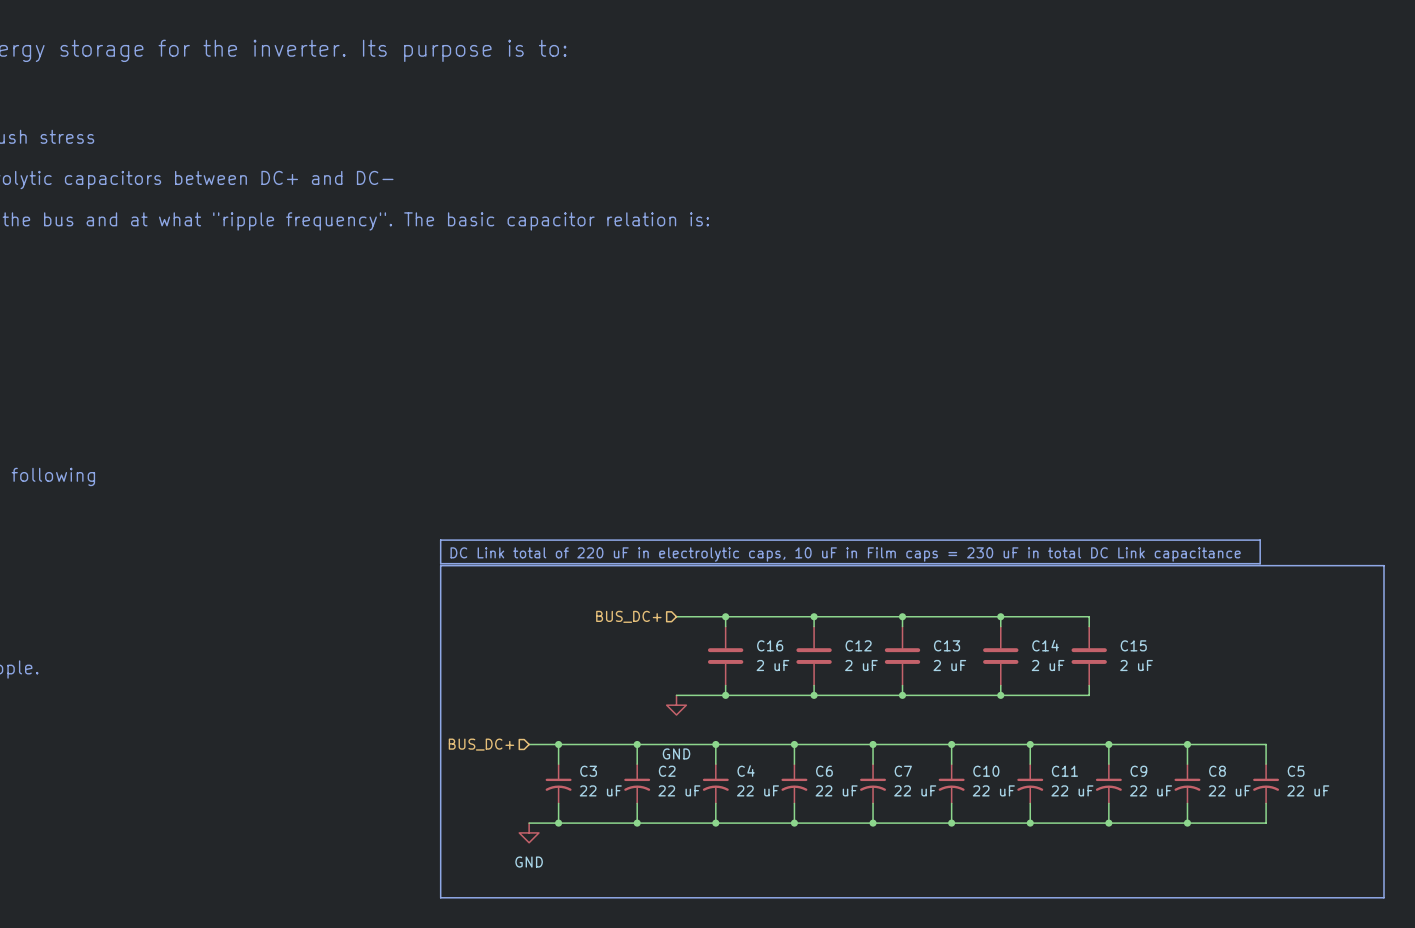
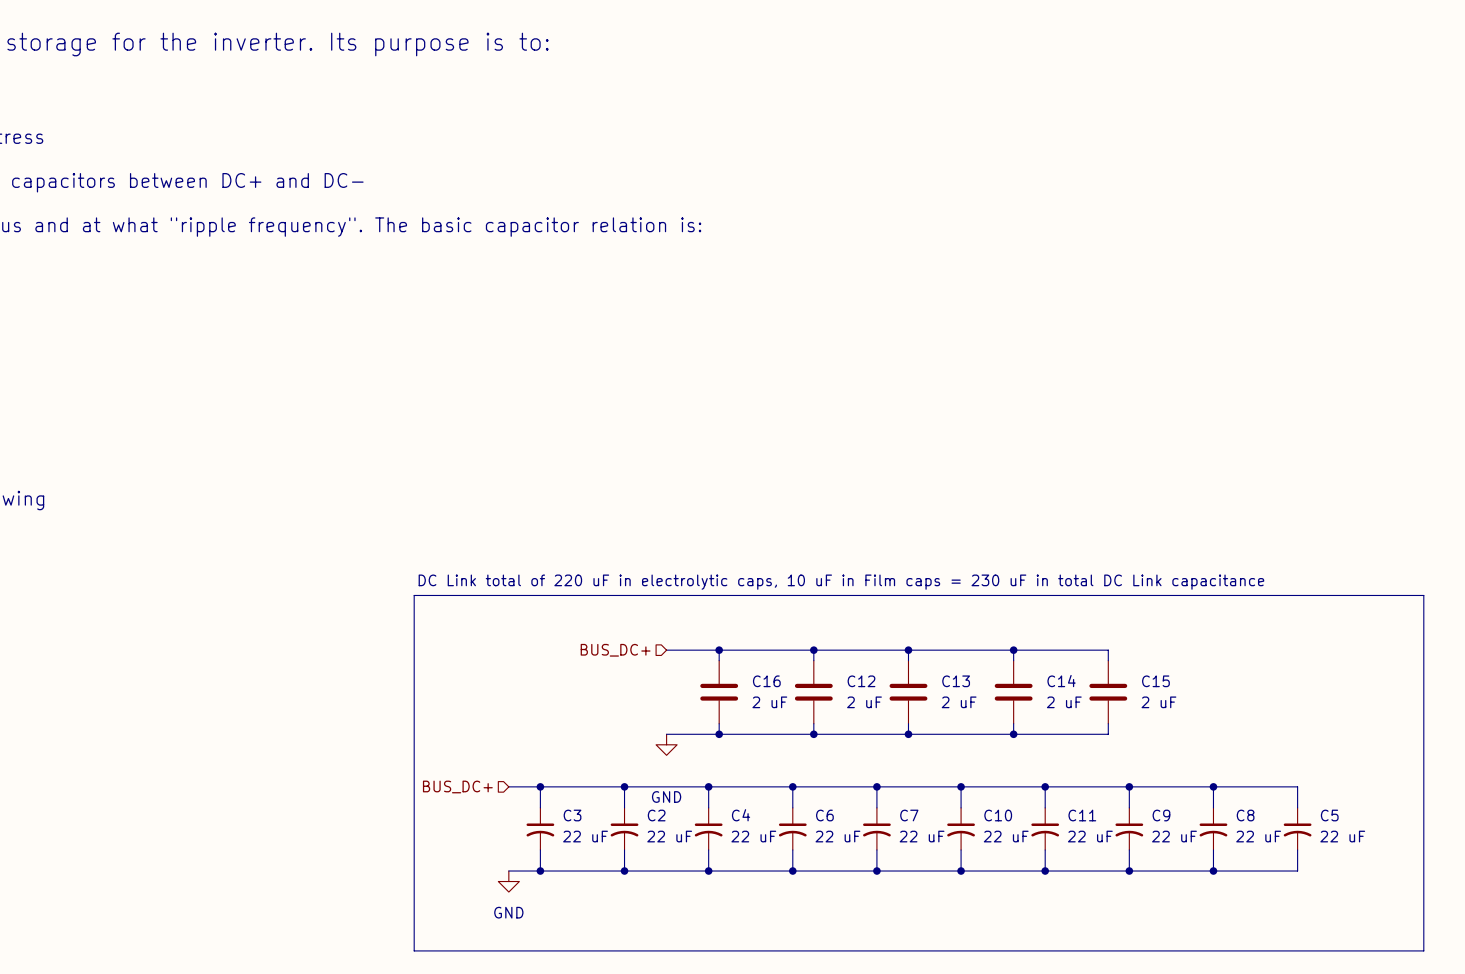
line: (440, 540) (1260, 540) (1260, 563) (440, 563) (440, 540) -> none
text: none -> DC Link total of 220 uF in electrolytic caps, 10 uF in Film caps = 230 uF in total DC Link capacitance (841, 582)
text: DC Link total of 220 uF in electrolytic caps, 10 uF in Film caps = 230 uF in total DC Link capacitance (845, 554) -> none

